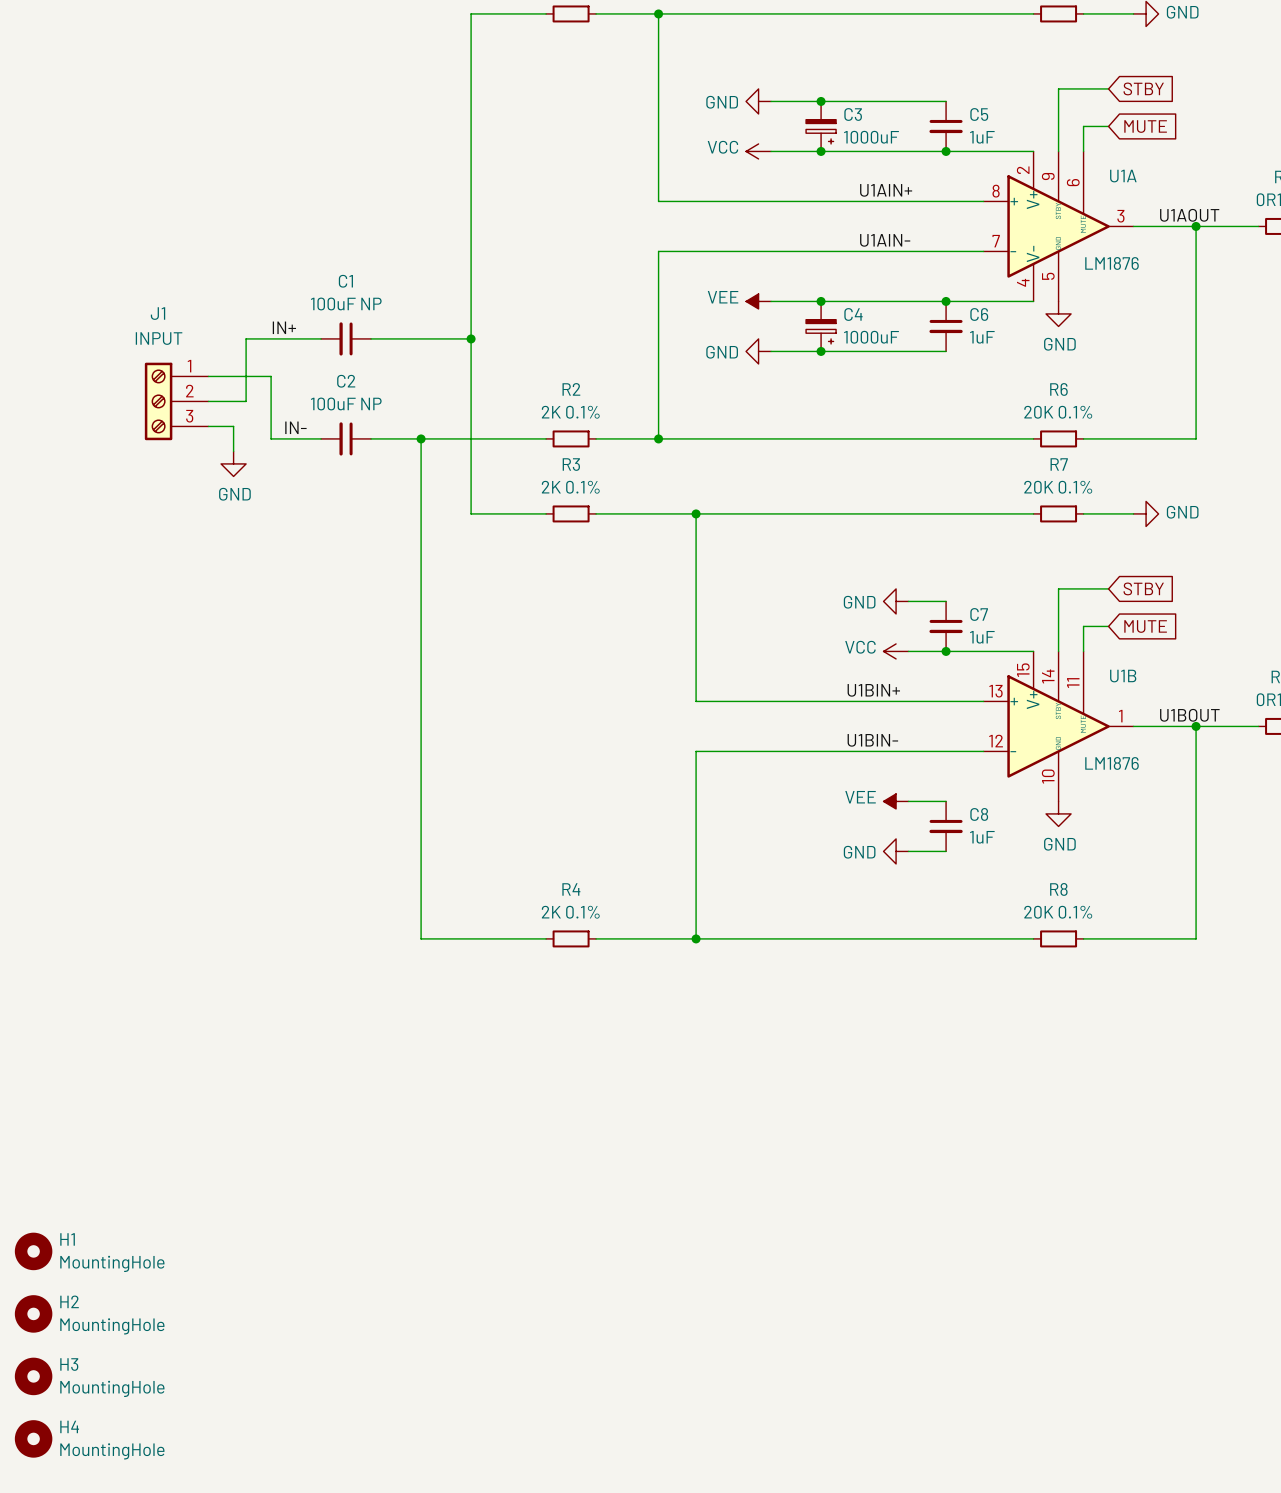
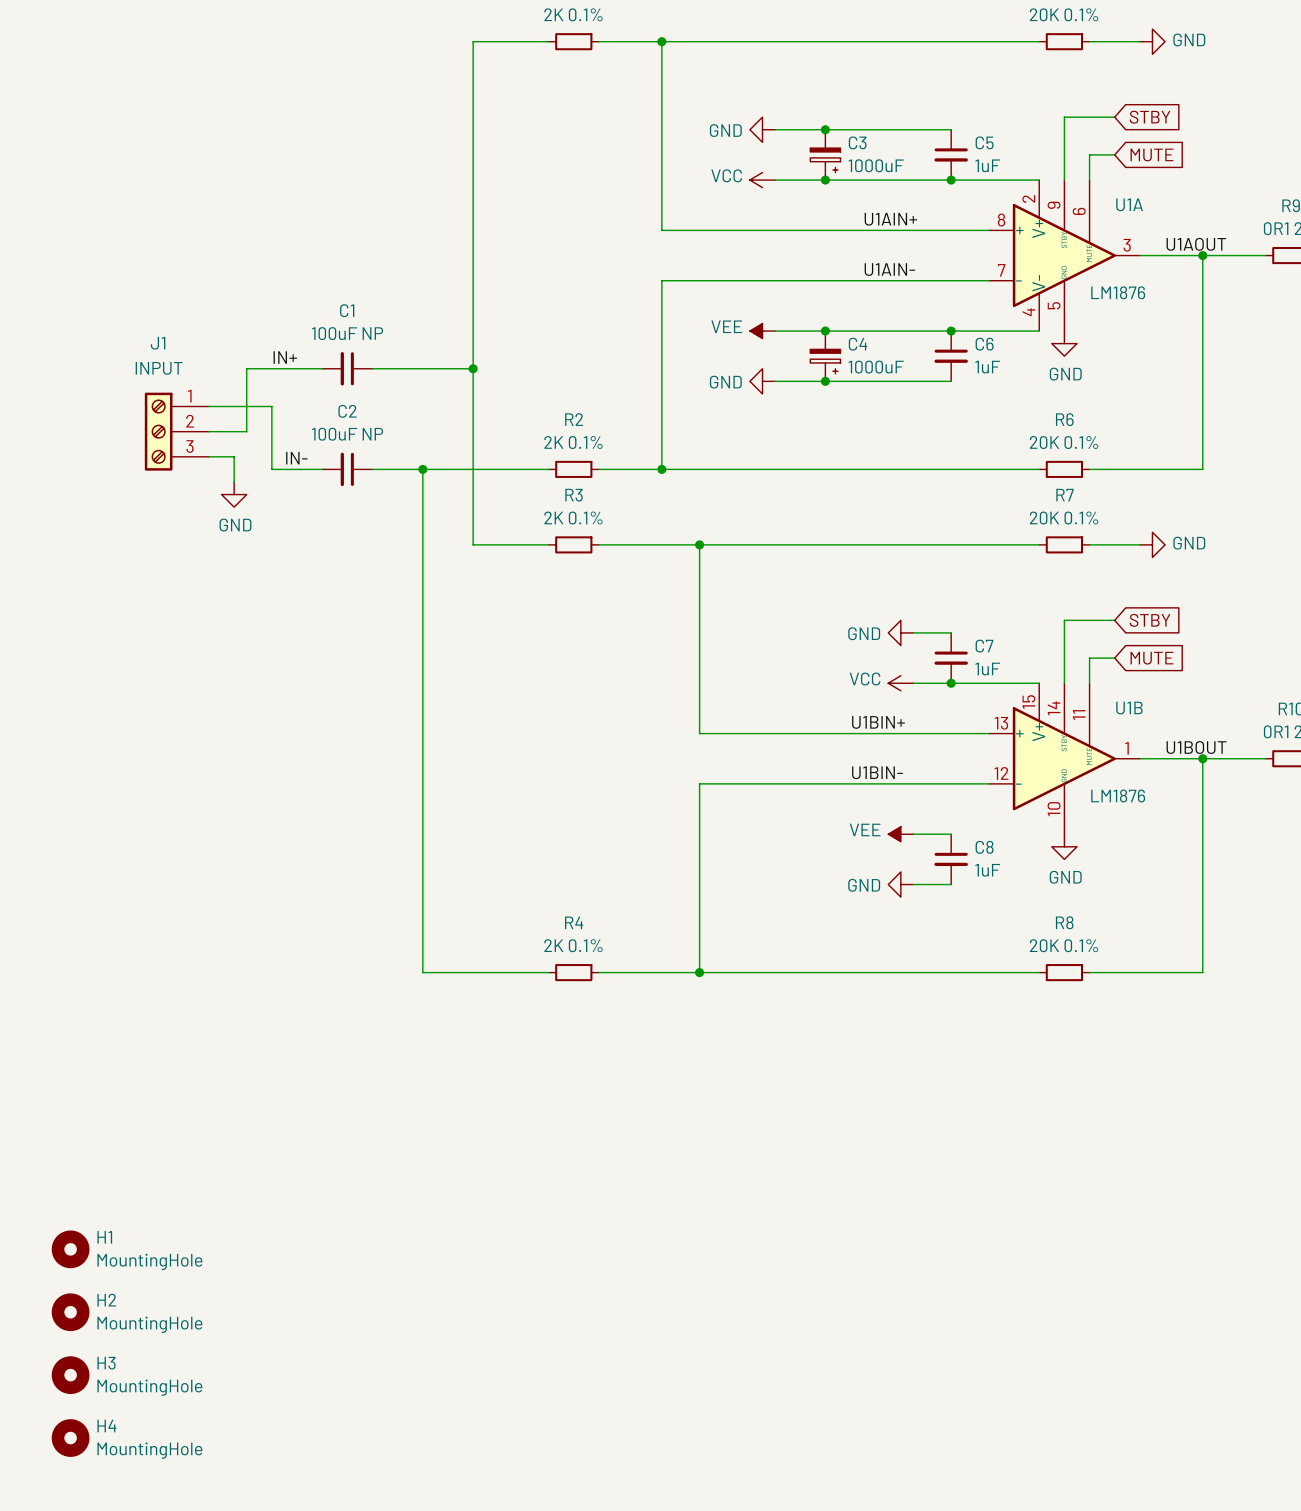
H1 position: (33, 1251) -> (70, 1249)
H2 position: (33, 1313) -> (70, 1312)
H3 position: (33, 1376) -> (70, 1375)
H4 position: (33, 1438) -> (70, 1438)

